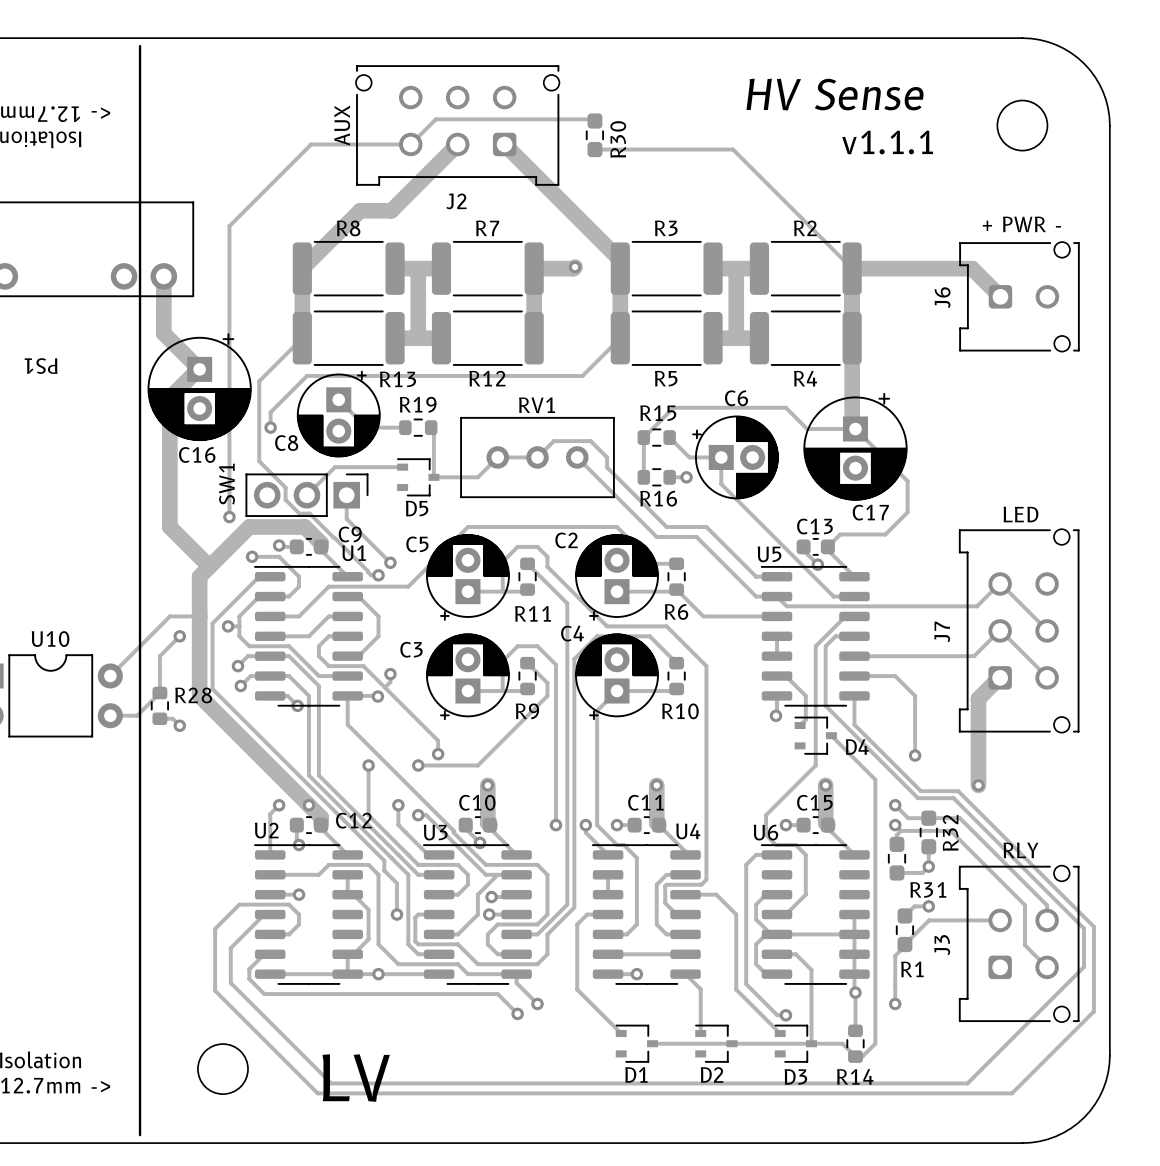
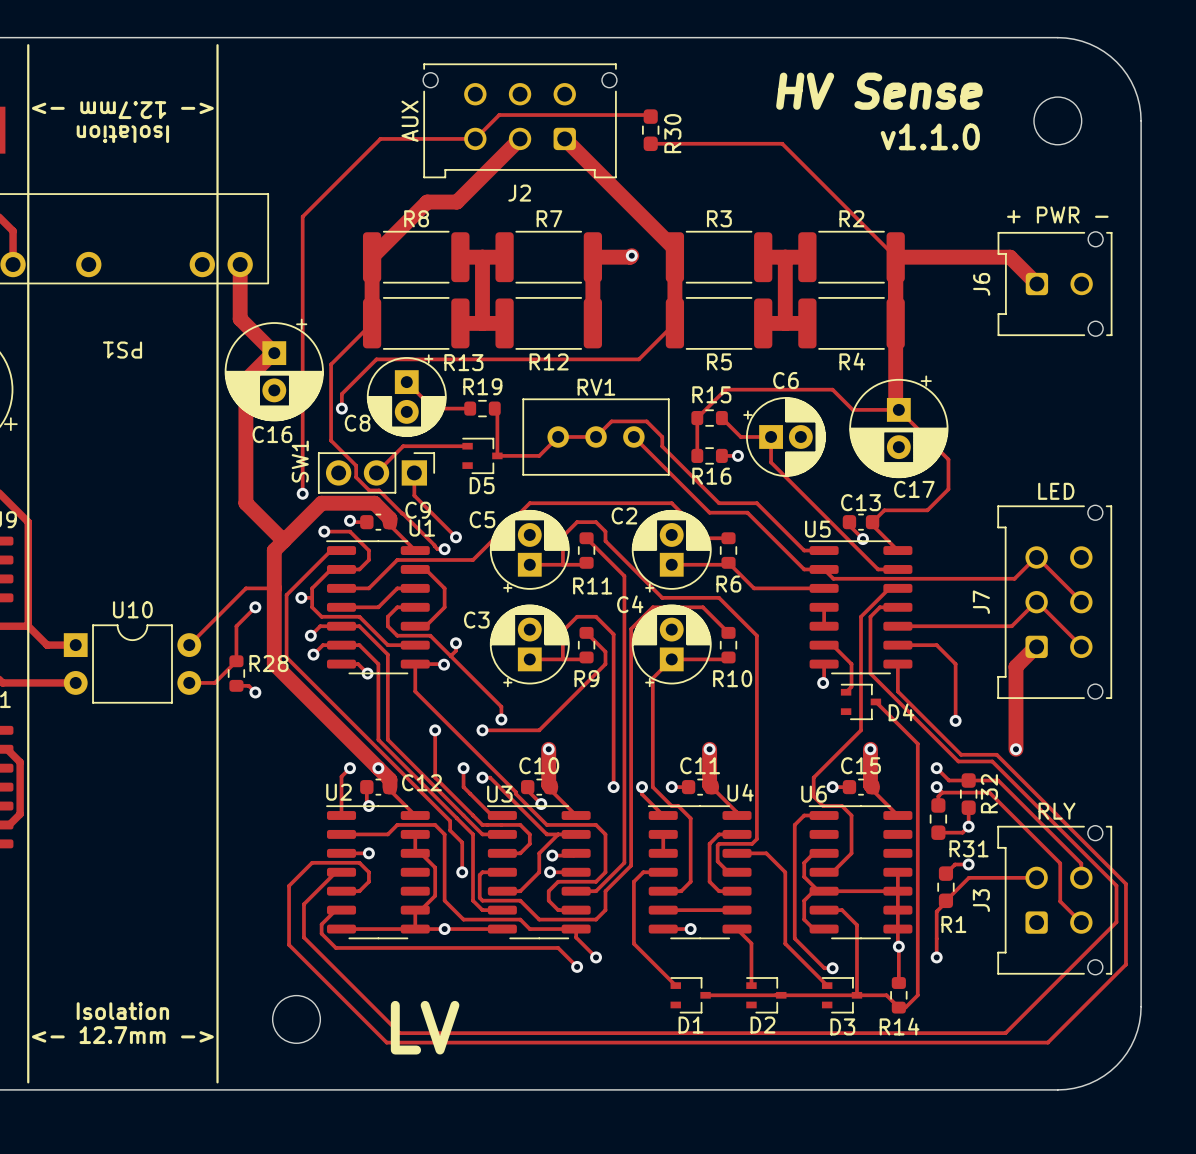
text: v1.1.1 (887, 142) -> v1.1.0 (930, 136)

